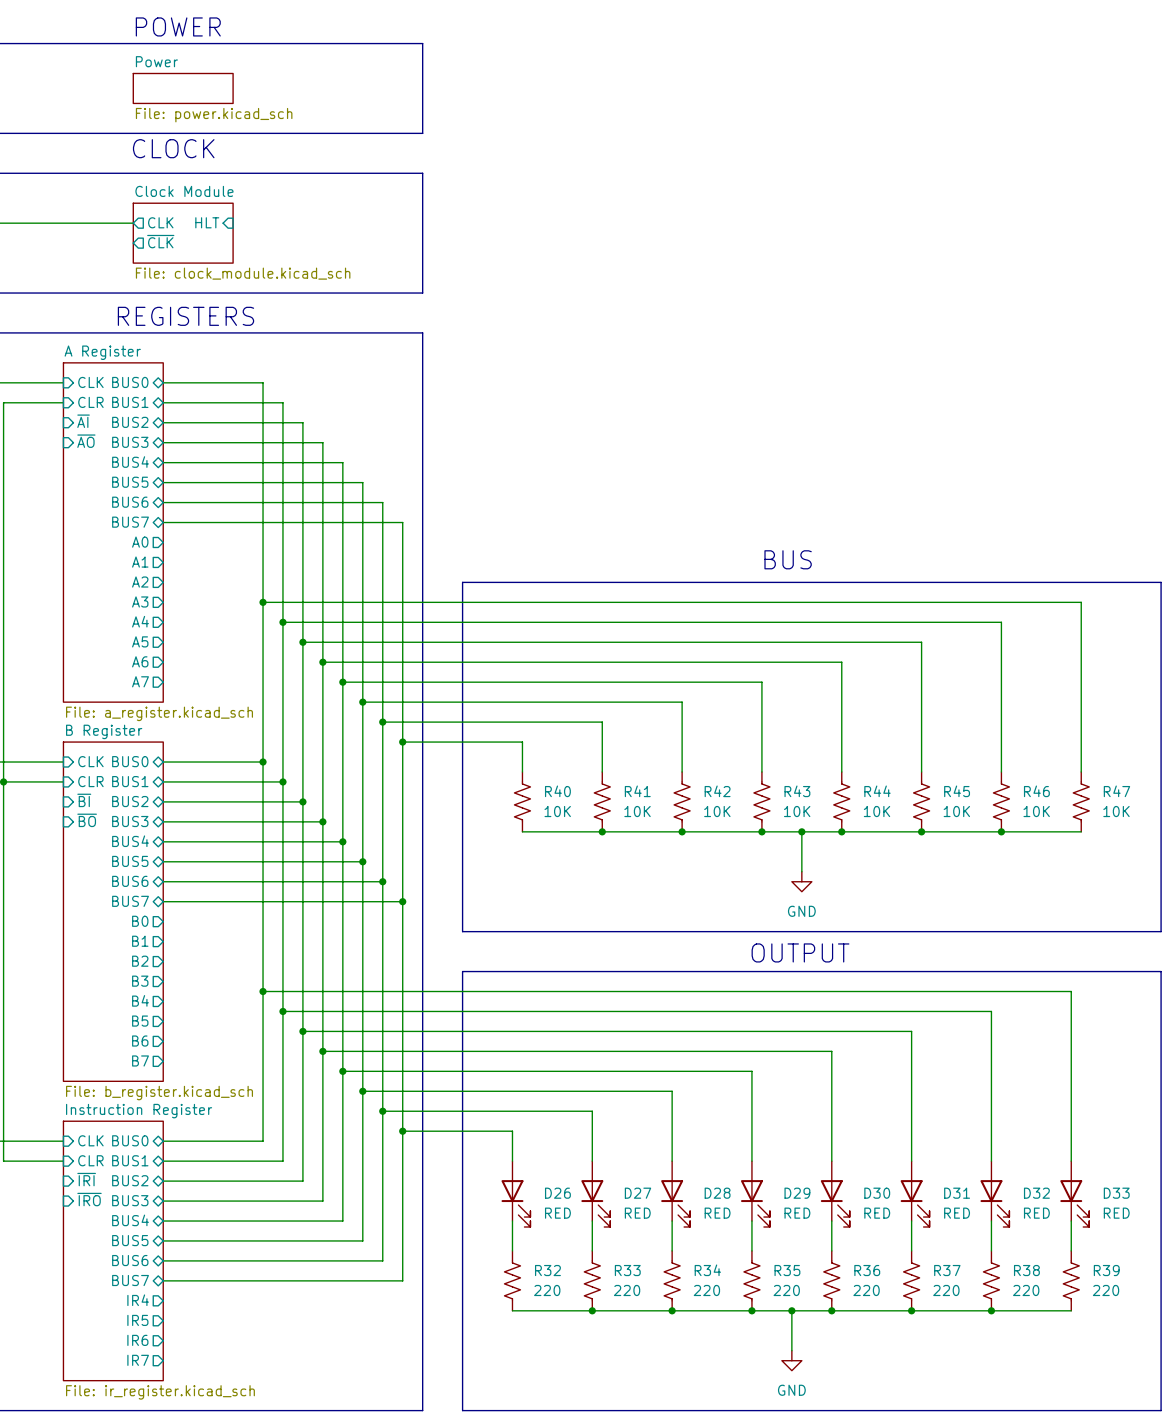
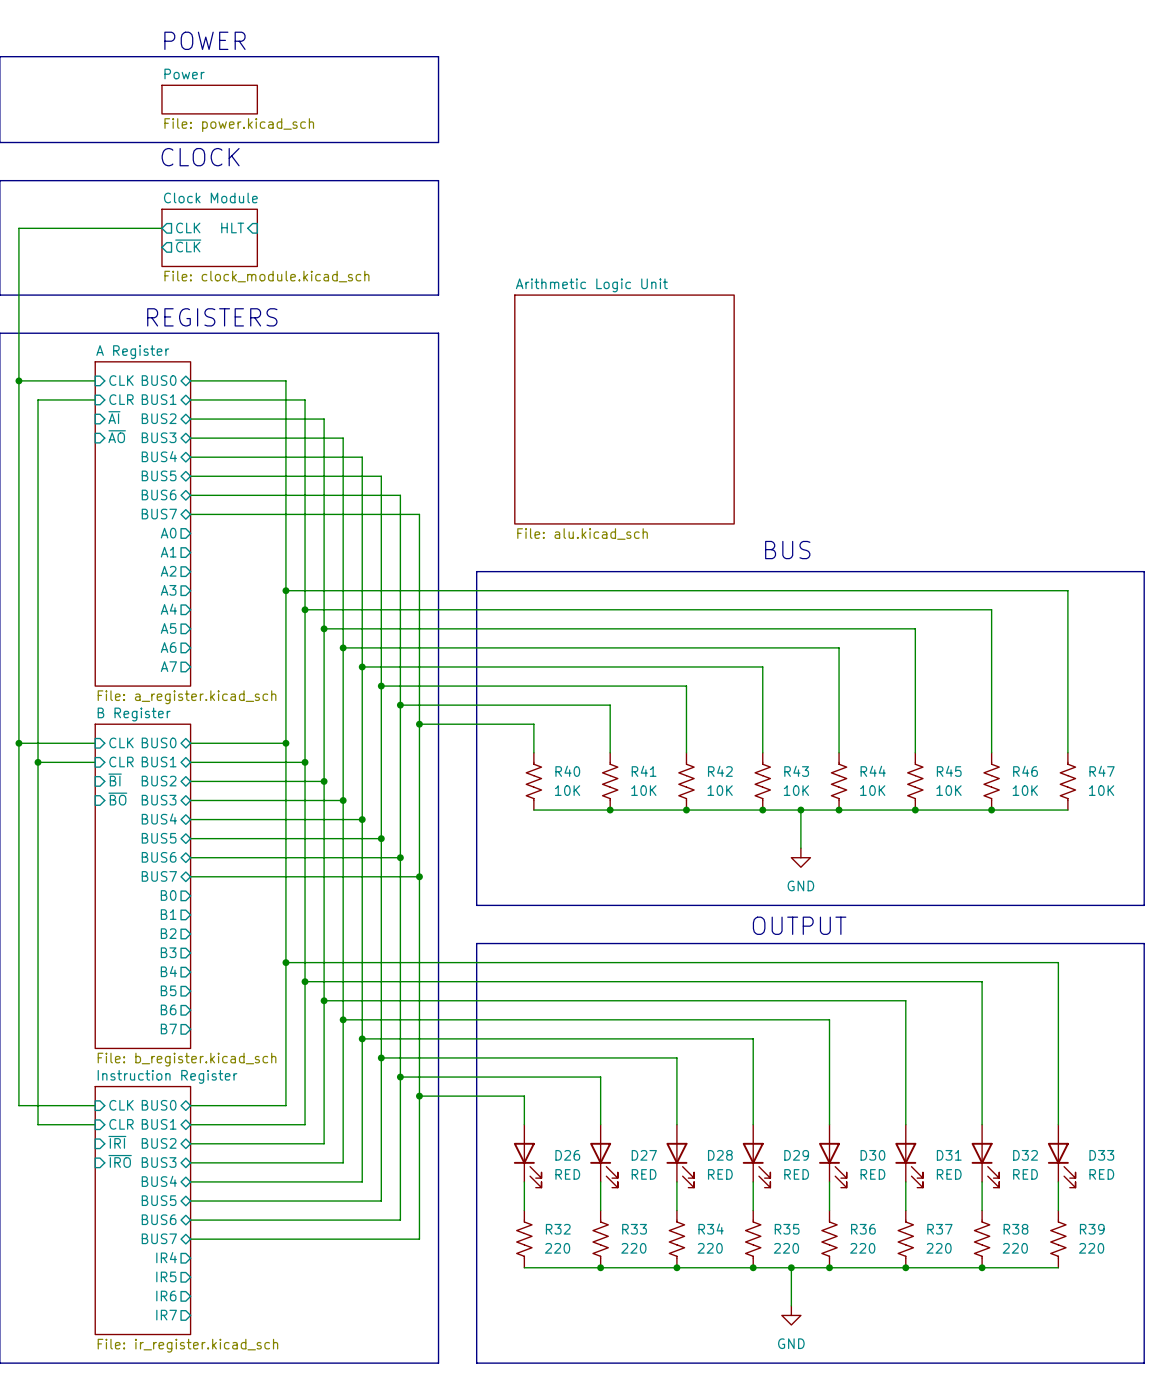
sheet Arithmetic Logic Unit: none -> File: alu.kicad_sch (624, 409)

